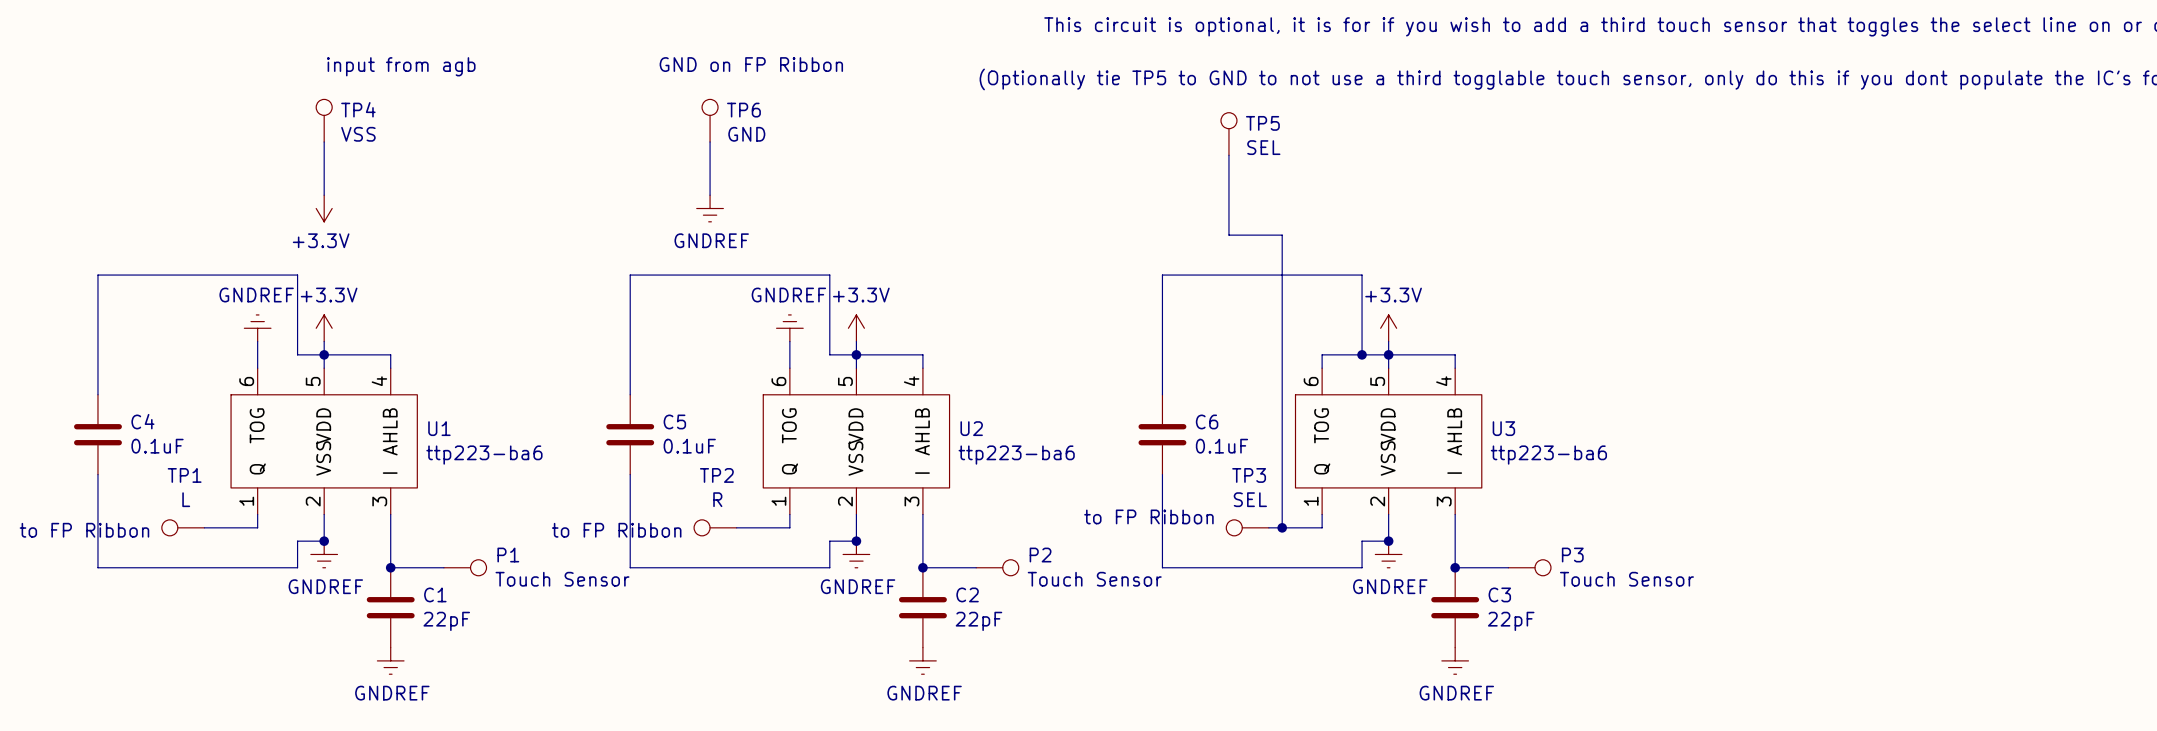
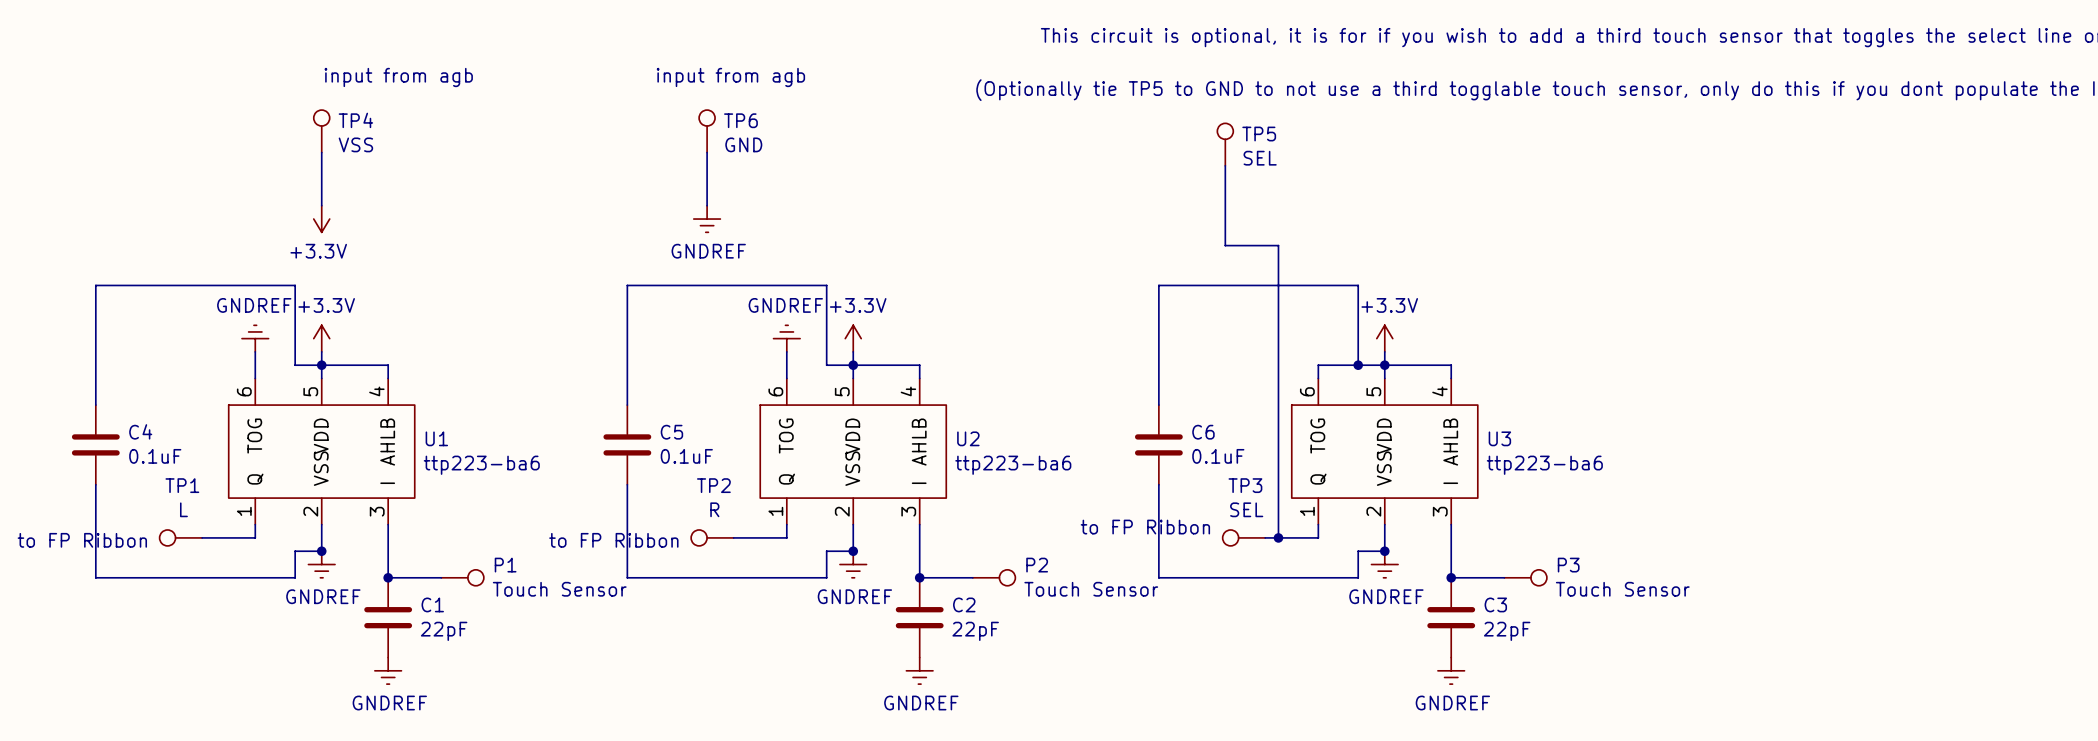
text: GND on FP Ribbon (751, 64) -> input from agb (730, 77)

